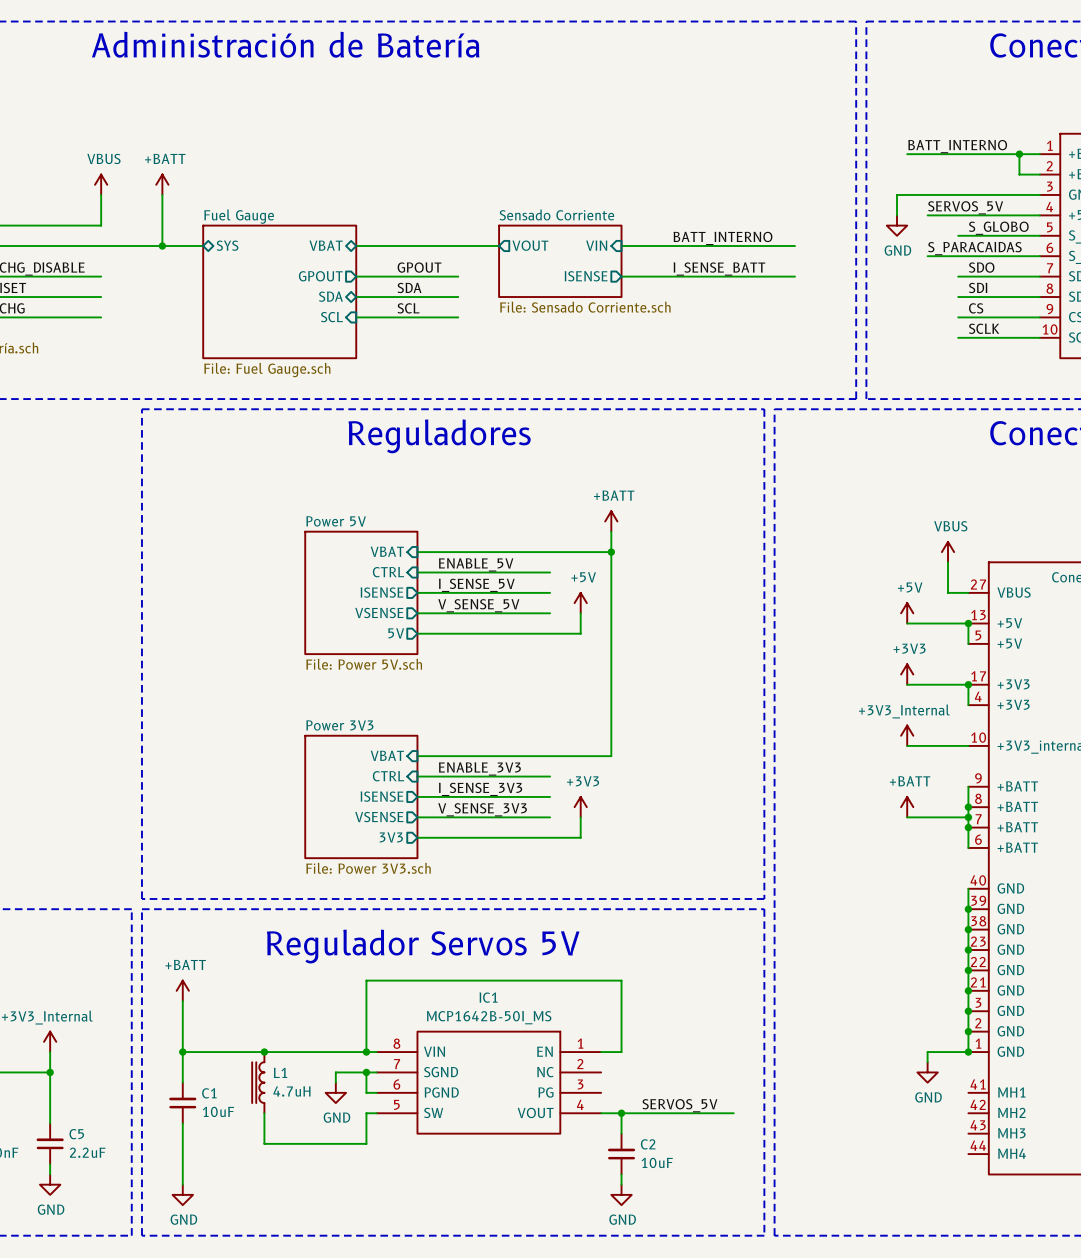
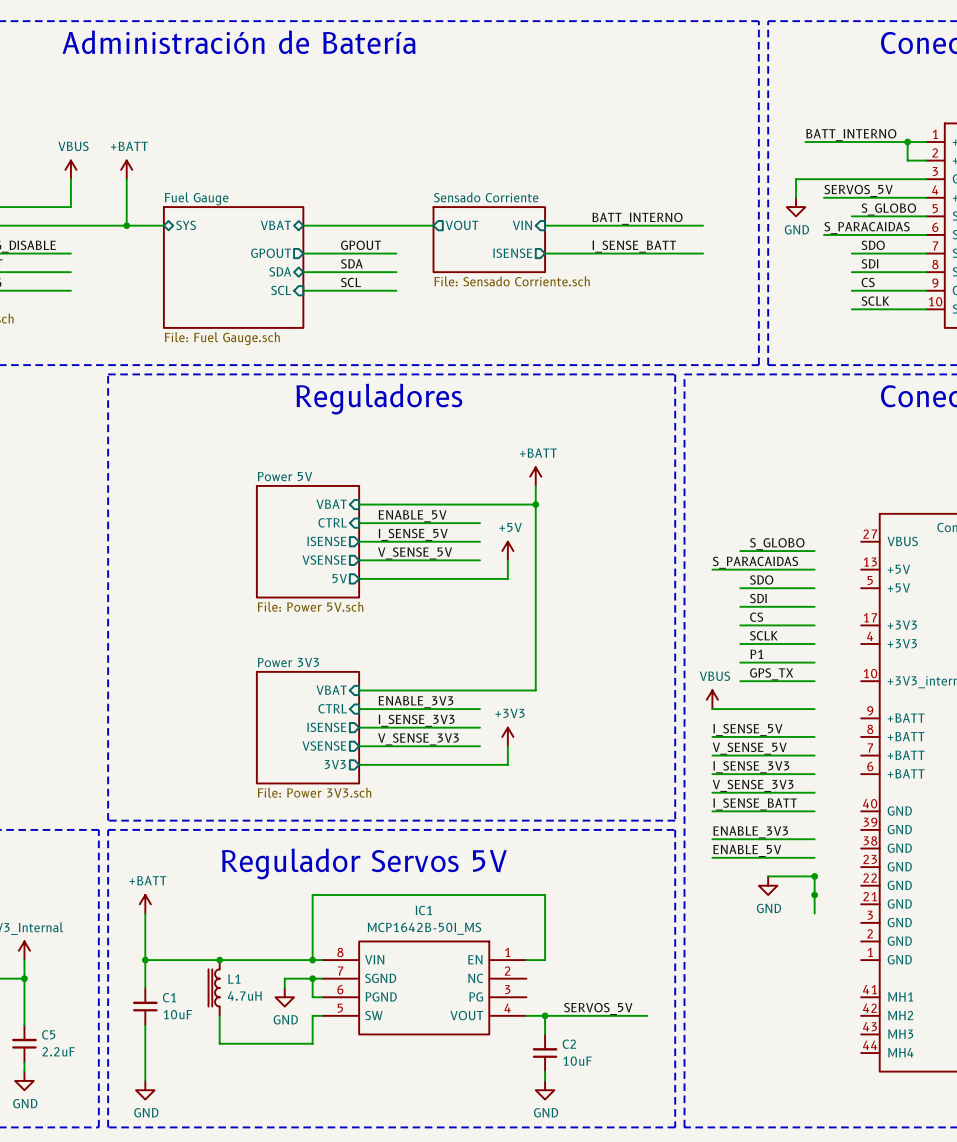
power symbol: VBUS (948, 552) -> none
wire: (948, 562) (948, 592) (968, 592) -> none
label: none -> S_GLOBO (777, 544)
wire: none -> (740, 551) (814, 551)
power symbol: +5V (907, 613) -> none
label: none -> S_PARACAIDAS (755, 562)
wire: none -> (712, 569) (805, 569)
wire: (917, 623) (968, 623) (968, 643) -> none
junction: (968, 623) -> none
label: none -> SDO (761, 579)
wire: none -> (740, 588) (814, 588)
label: none -> SDI (758, 598)
wire: none -> (740, 606) (814, 606)
power symbol: +3V3 (907, 674) -> none
label: none -> CS (756, 617)
wire: none -> (740, 625) (805, 625)
wire: (917, 684) (968, 684) (968, 705) -> none
junction: (968, 684) -> none
label: none -> SCLK (763, 635)
wire: none -> (740, 644) (814, 644)
label: none -> P1 (756, 654)
wire: none -> (740, 662) (814, 662)
power symbol: +3V3_Internal (907, 735) -> none
label: none -> GPS_TX (771, 674)
wire: none -> (740, 681) (805, 681)
wire: (917, 745) (968, 745) -> none
power symbol: none -> VBUS (712, 699)
wire: none -> (712, 709) (814, 709)
wire: (968, 786) (968, 847) -> none
label: none -> I_SENSE_5V (747, 730)
wire: none -> (712, 736) (814, 736)
power symbol: +BATT (907, 807) -> none
junction: (968, 807) -> none
wire: (907, 817) (968, 817) -> none
junction: (968, 817) -> none
label: none -> V_SENSE_5V (749, 748)
wire: none -> (712, 755) (814, 755)
junction: (968, 827) -> none
label: none -> I_SENSE_3V3 (751, 767)
wire: none -> (712, 774) (814, 774)
label: none -> V_SENSE_3V3 (753, 785)
wire: none -> (712, 792) (814, 792)
label: none -> I_SENSE_BATT (755, 804)
wire: none -> (712, 811) (814, 811)
wire: (968, 888) (968, 1052) (927, 1052) (927, 1062) -> none
junction: (968, 909) -> none
label: none -> ENABLE_3V3 (750, 832)
wire: none -> (712, 839) (814, 839)
junction: (968, 929) -> none
label: none -> ENABLE_5V (747, 850)
wire: none -> (712, 857) (814, 857)
junction: (968, 950) -> none
wire: none -> (768, 876) (814, 876) (814, 913)
junction: none -> (814, 876)
junction: (968, 970) -> none
junction: none -> (814, 895)
junction: (968, 990) -> none
junction: (968, 1011) -> none
junction: (968, 1031) -> none
junction: (968, 1052) -> none
power symbol position: GND (927, 1072) -> GND (768, 885)

